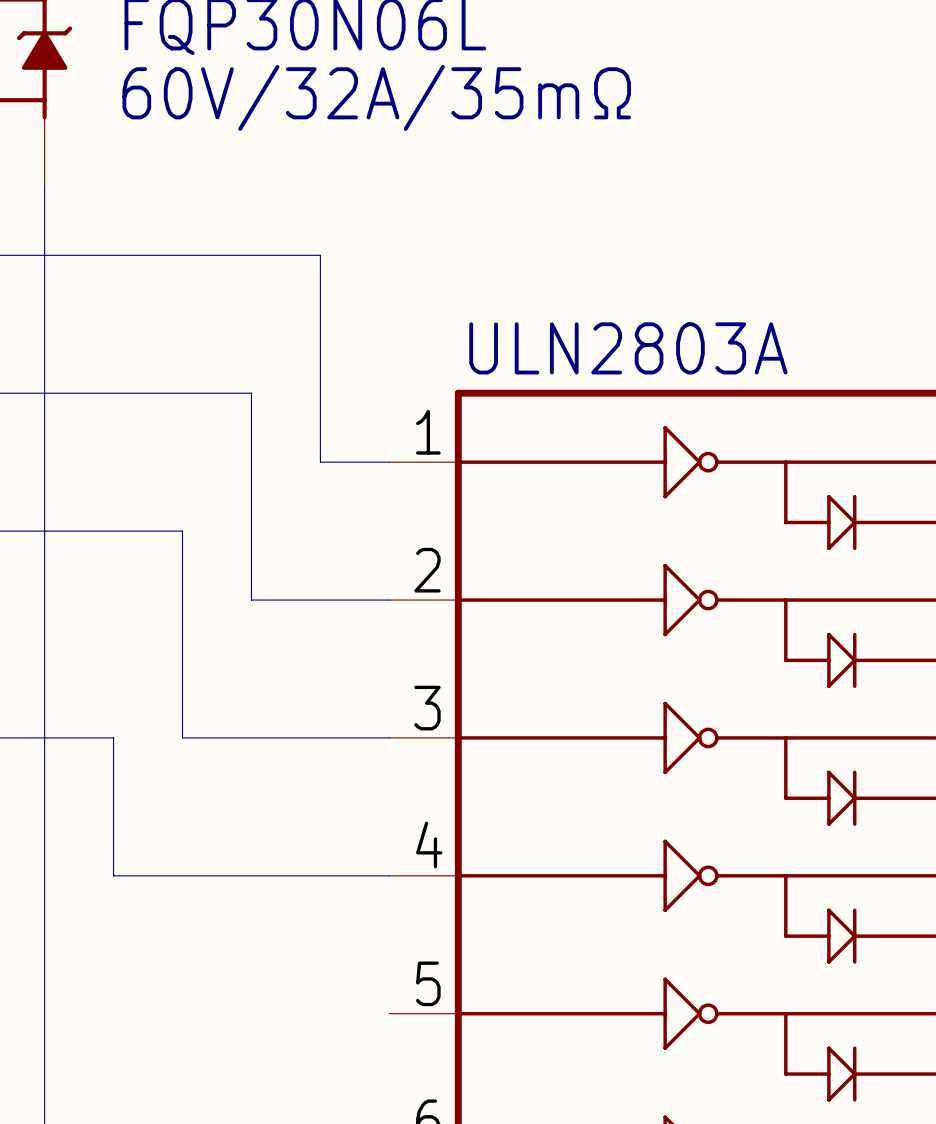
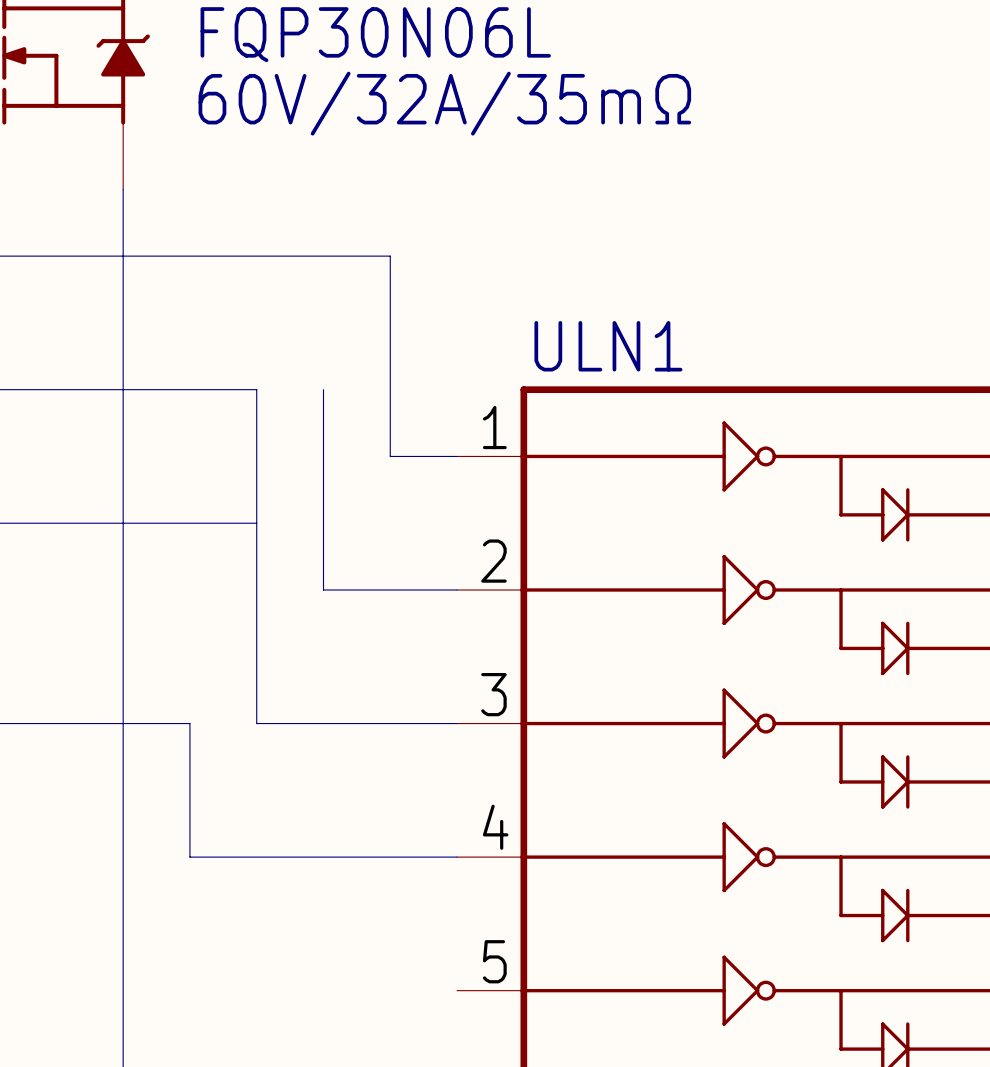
ULN2803A name: ULN2803A (628, 348) -> ULN1 (608, 346)
wire: (182, 393) (251, 393) -> (256, 389) (256, 523)

